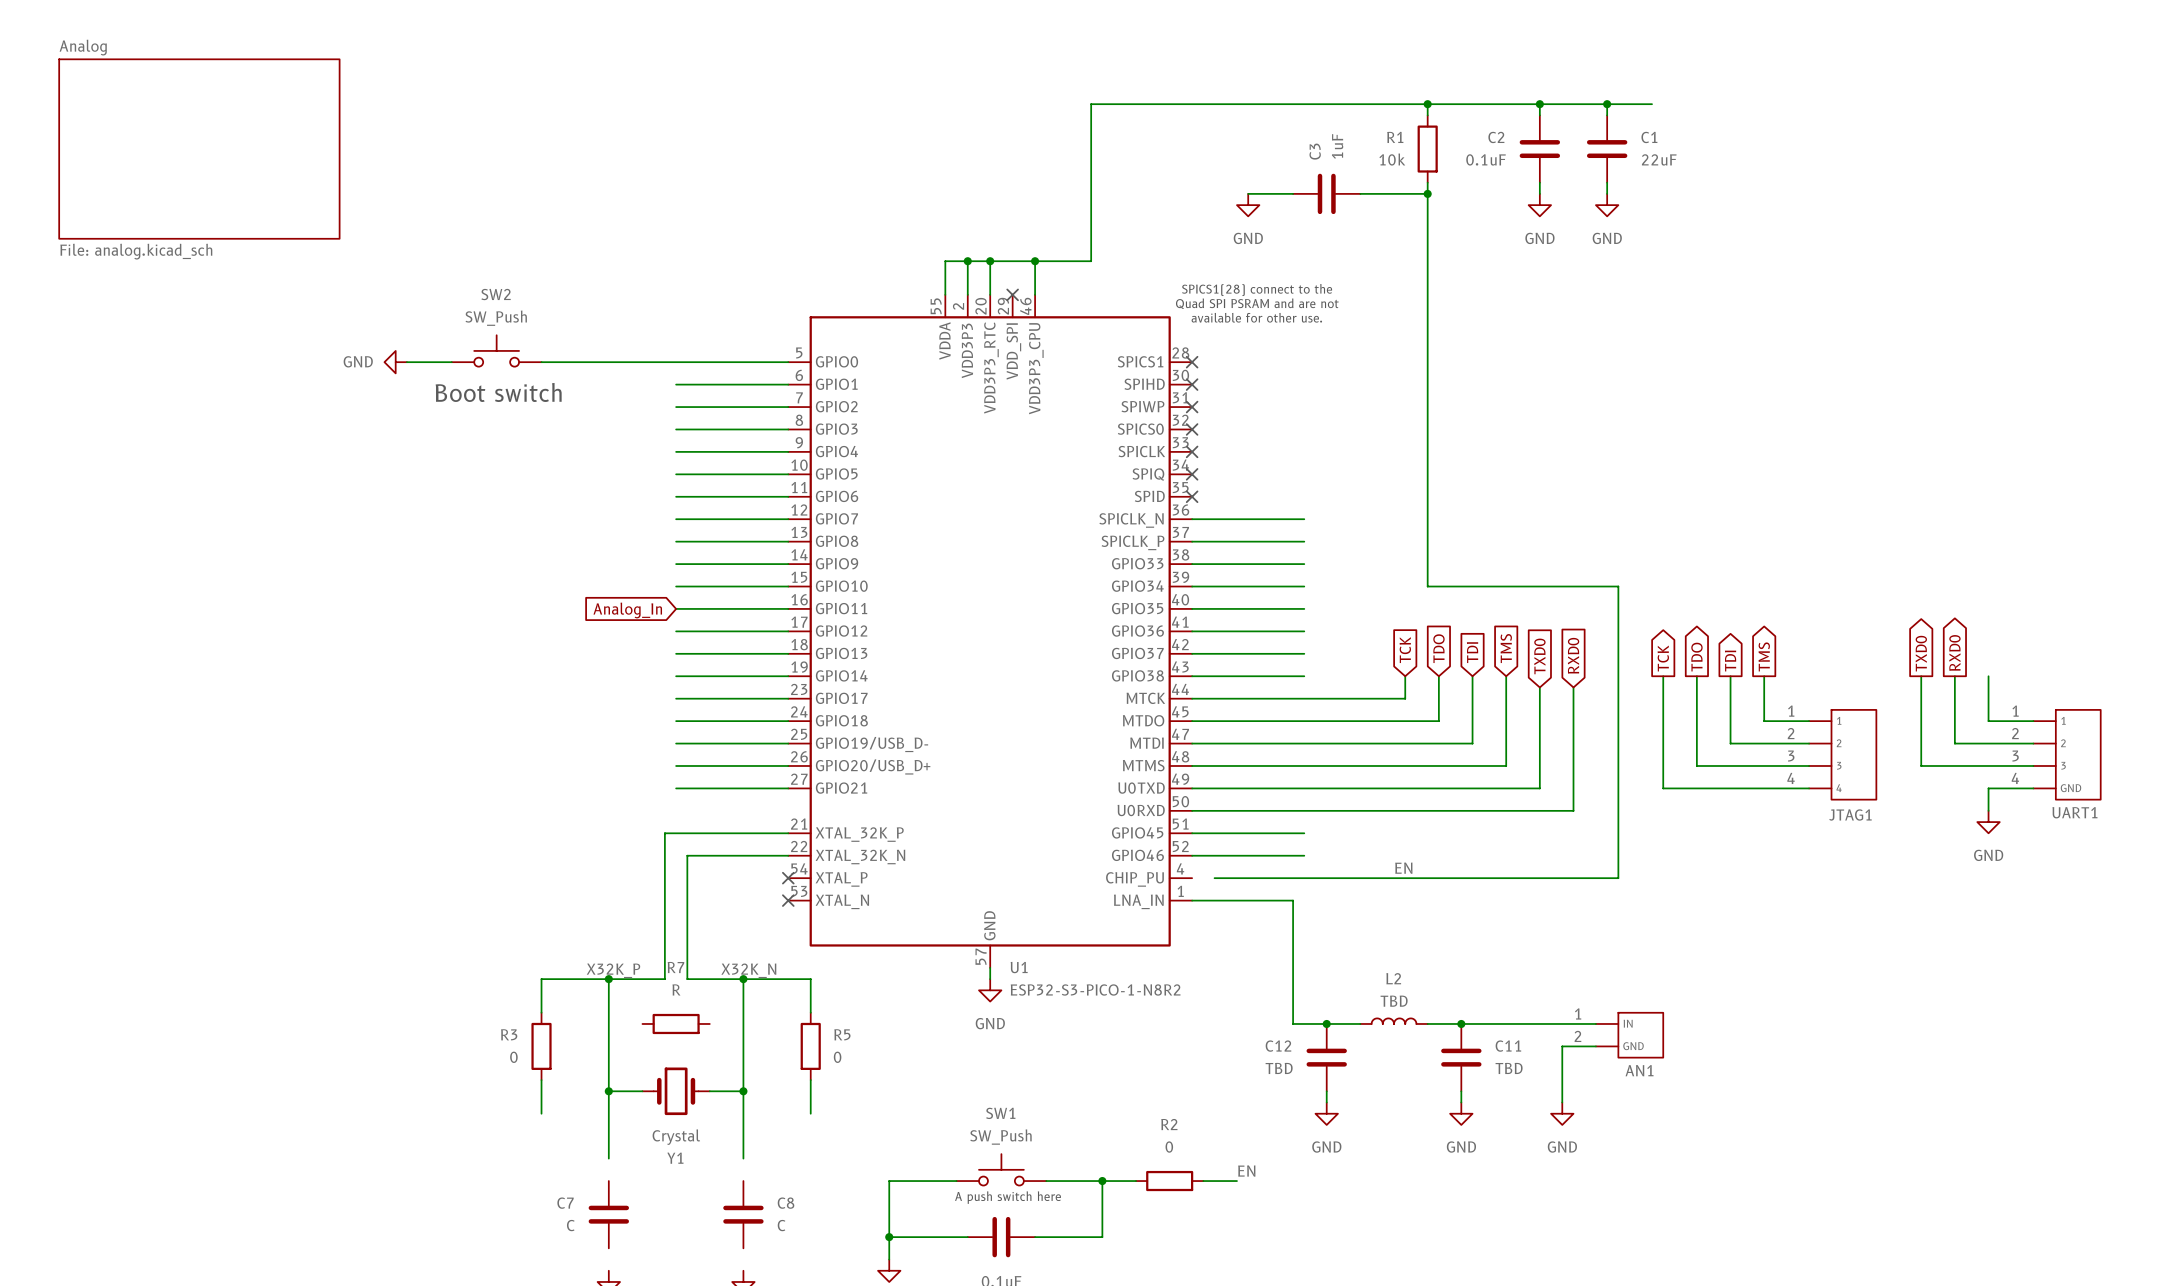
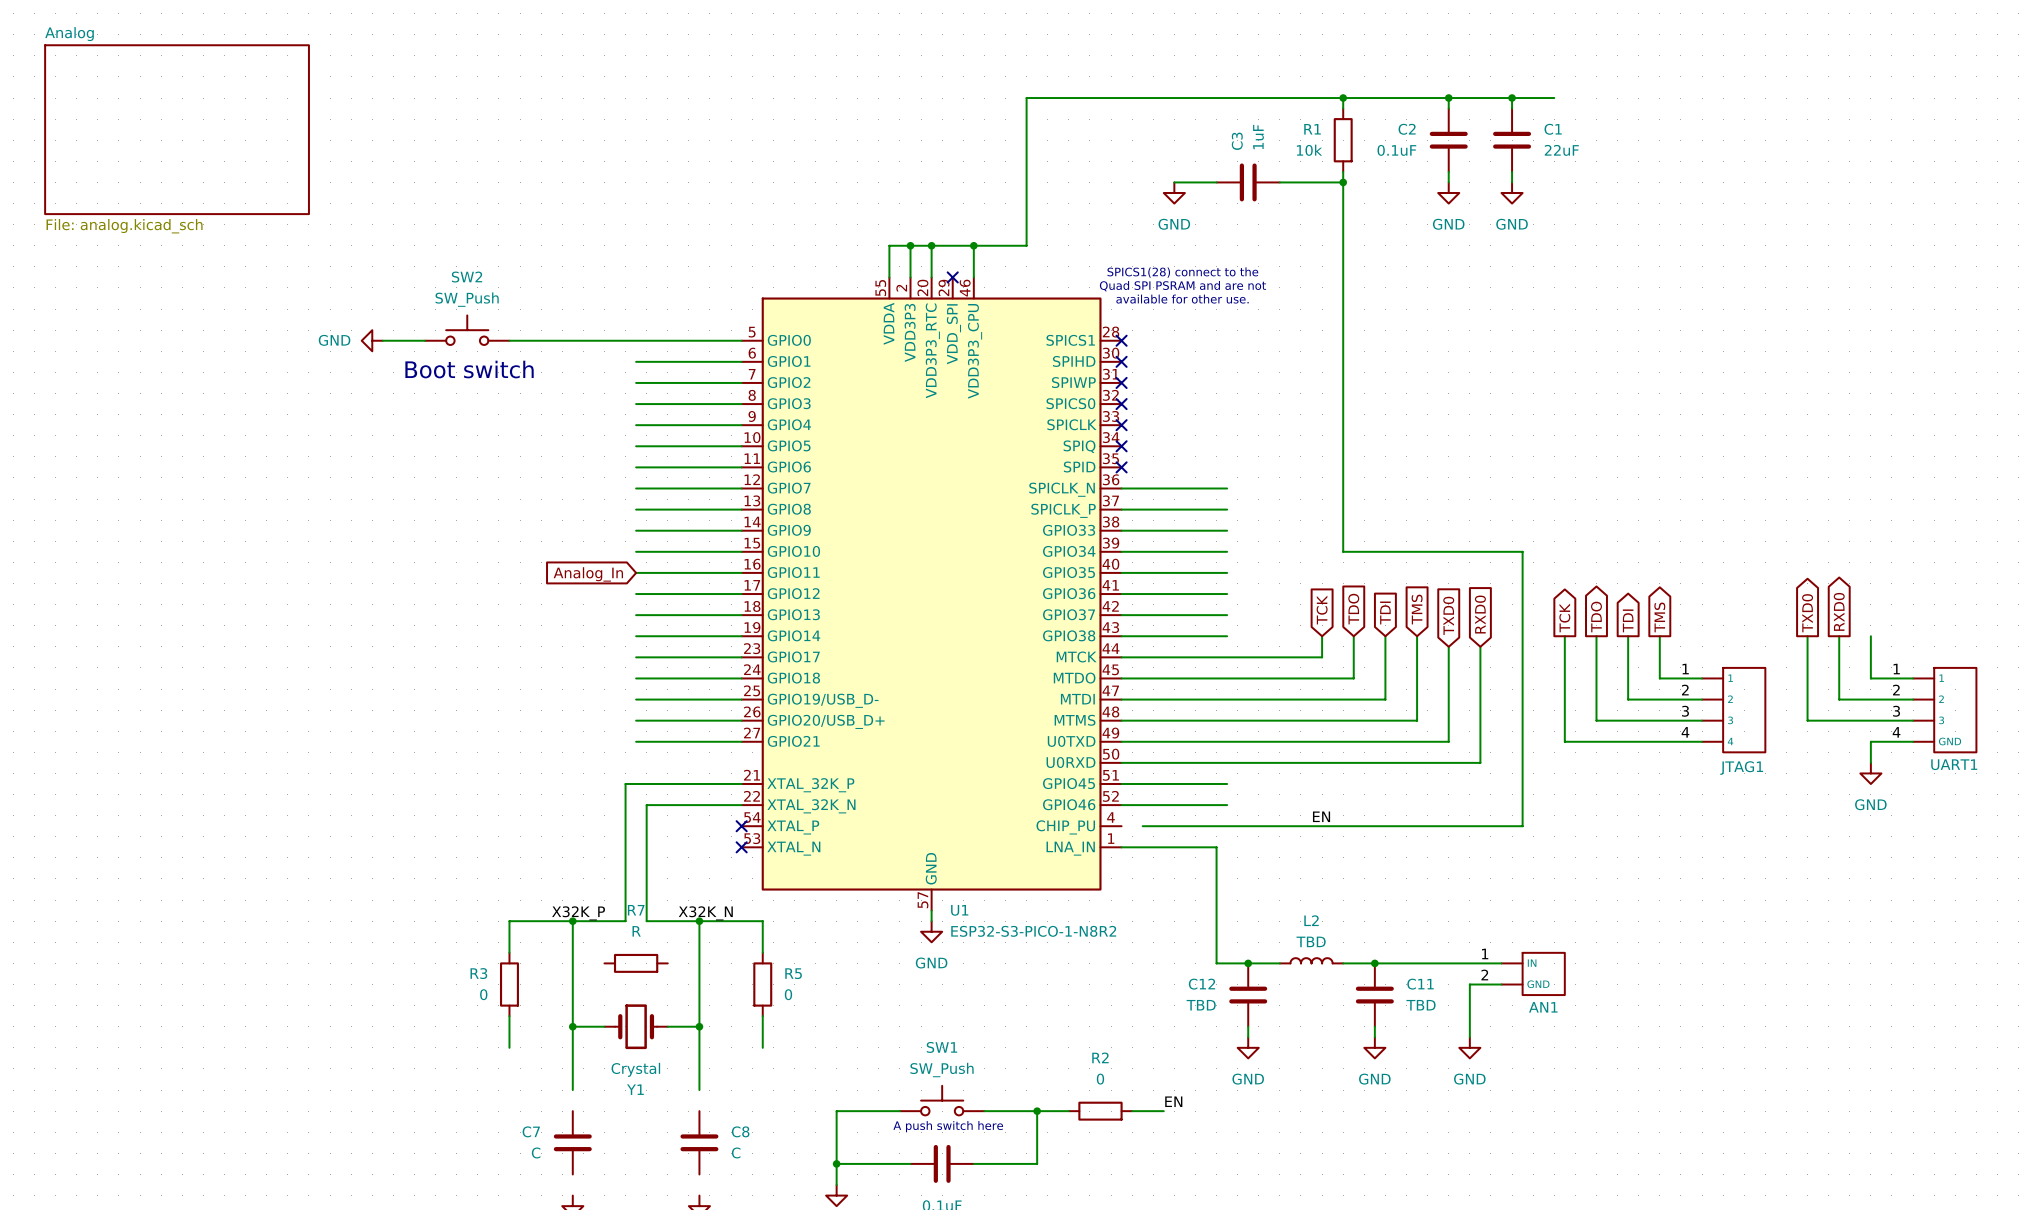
sheet Analog position: (199, 149) -> (177, 129)

